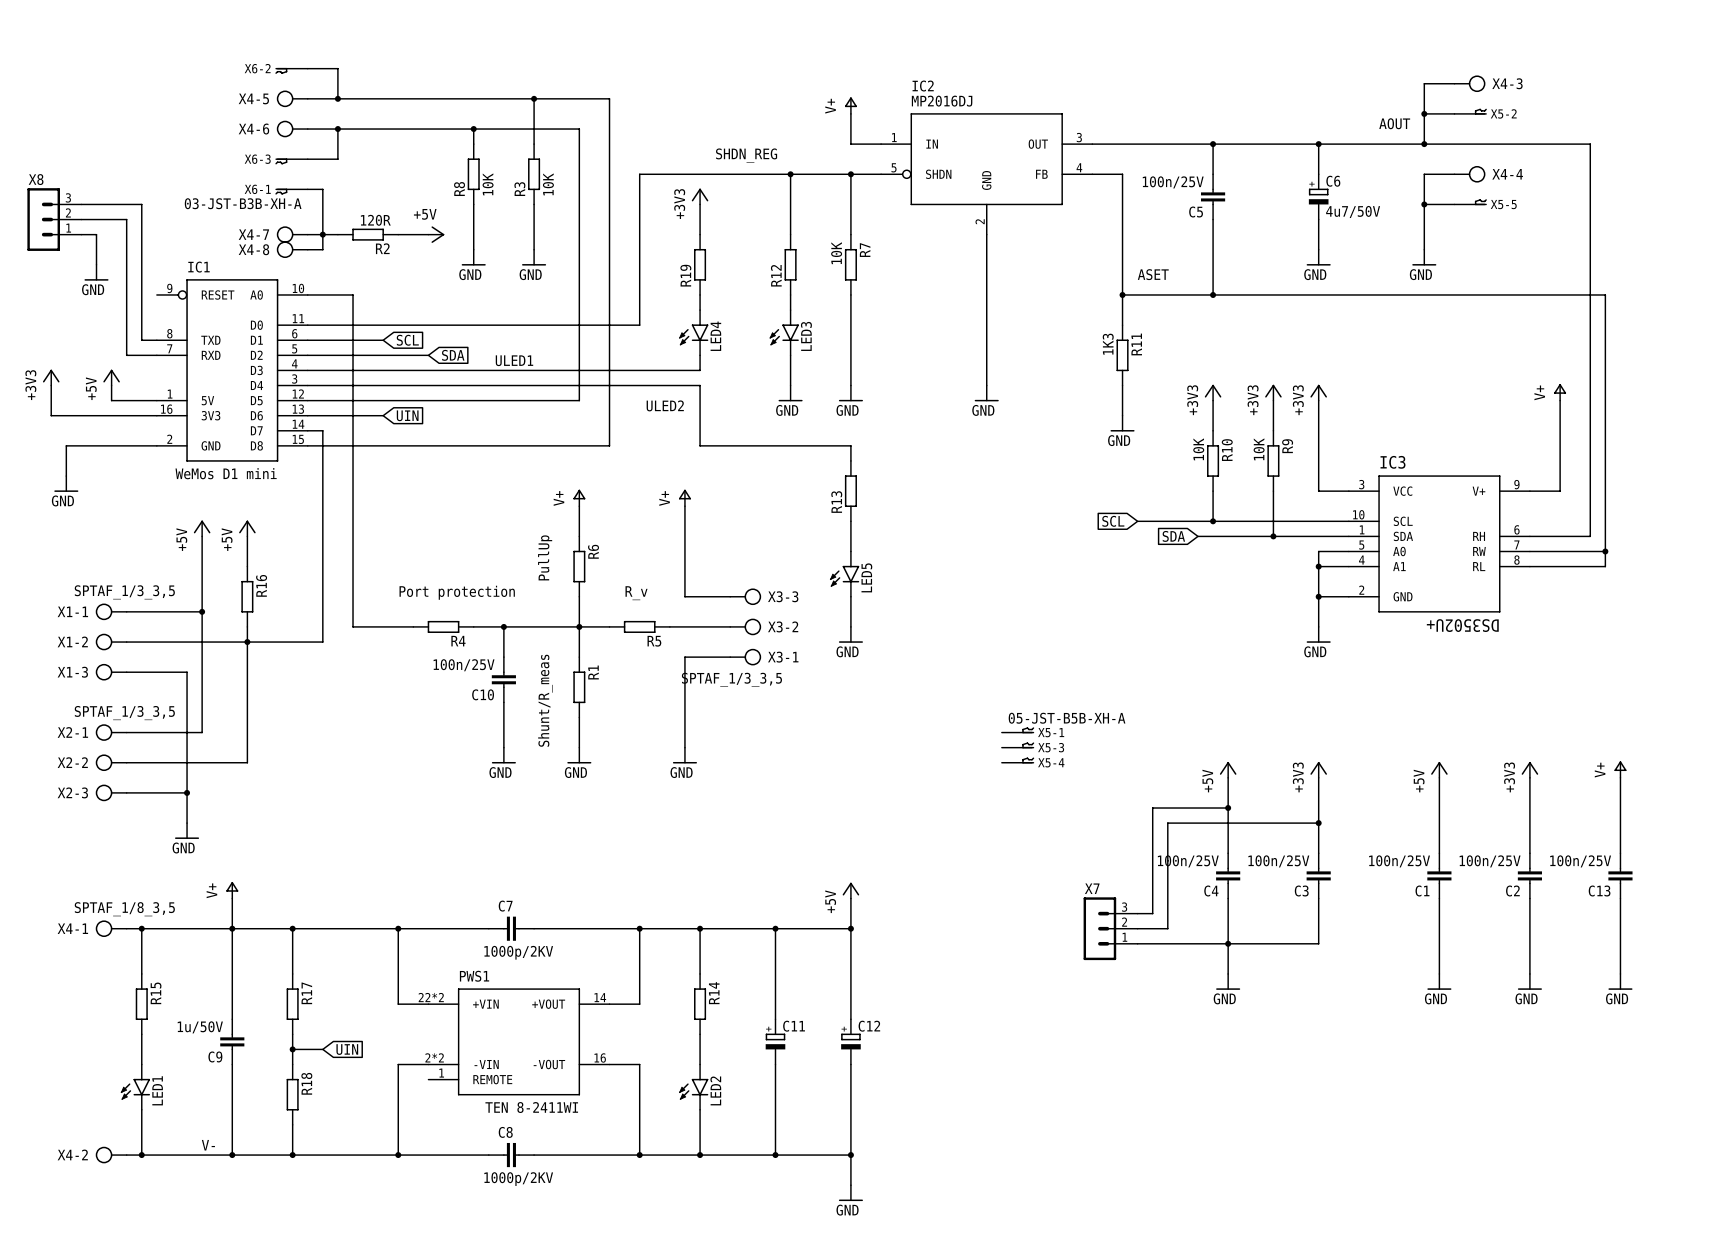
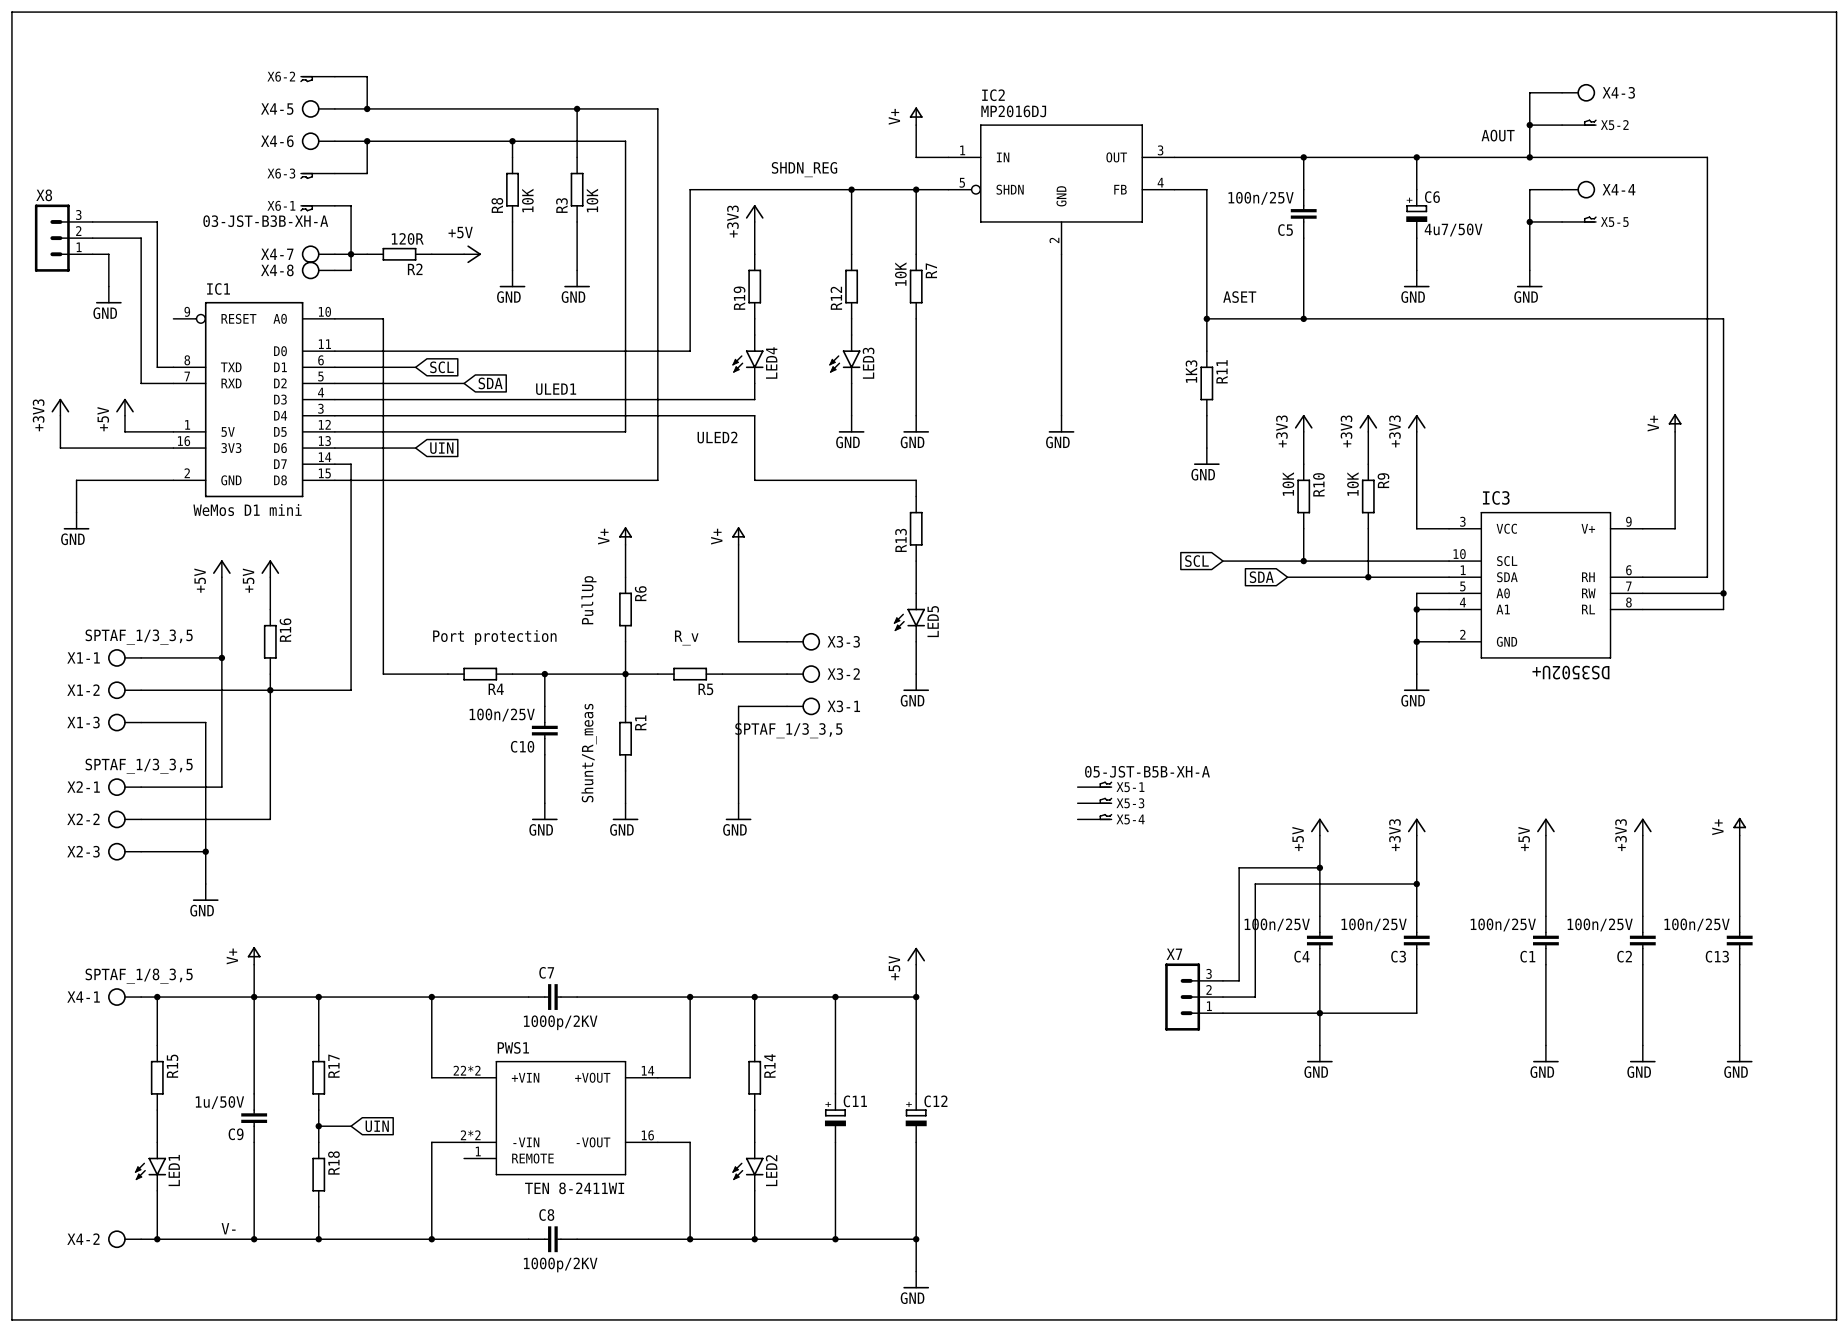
wire: none -> (11, 12) (1836, 12) (1836, 1319) (11, 1319) (11, 12)

